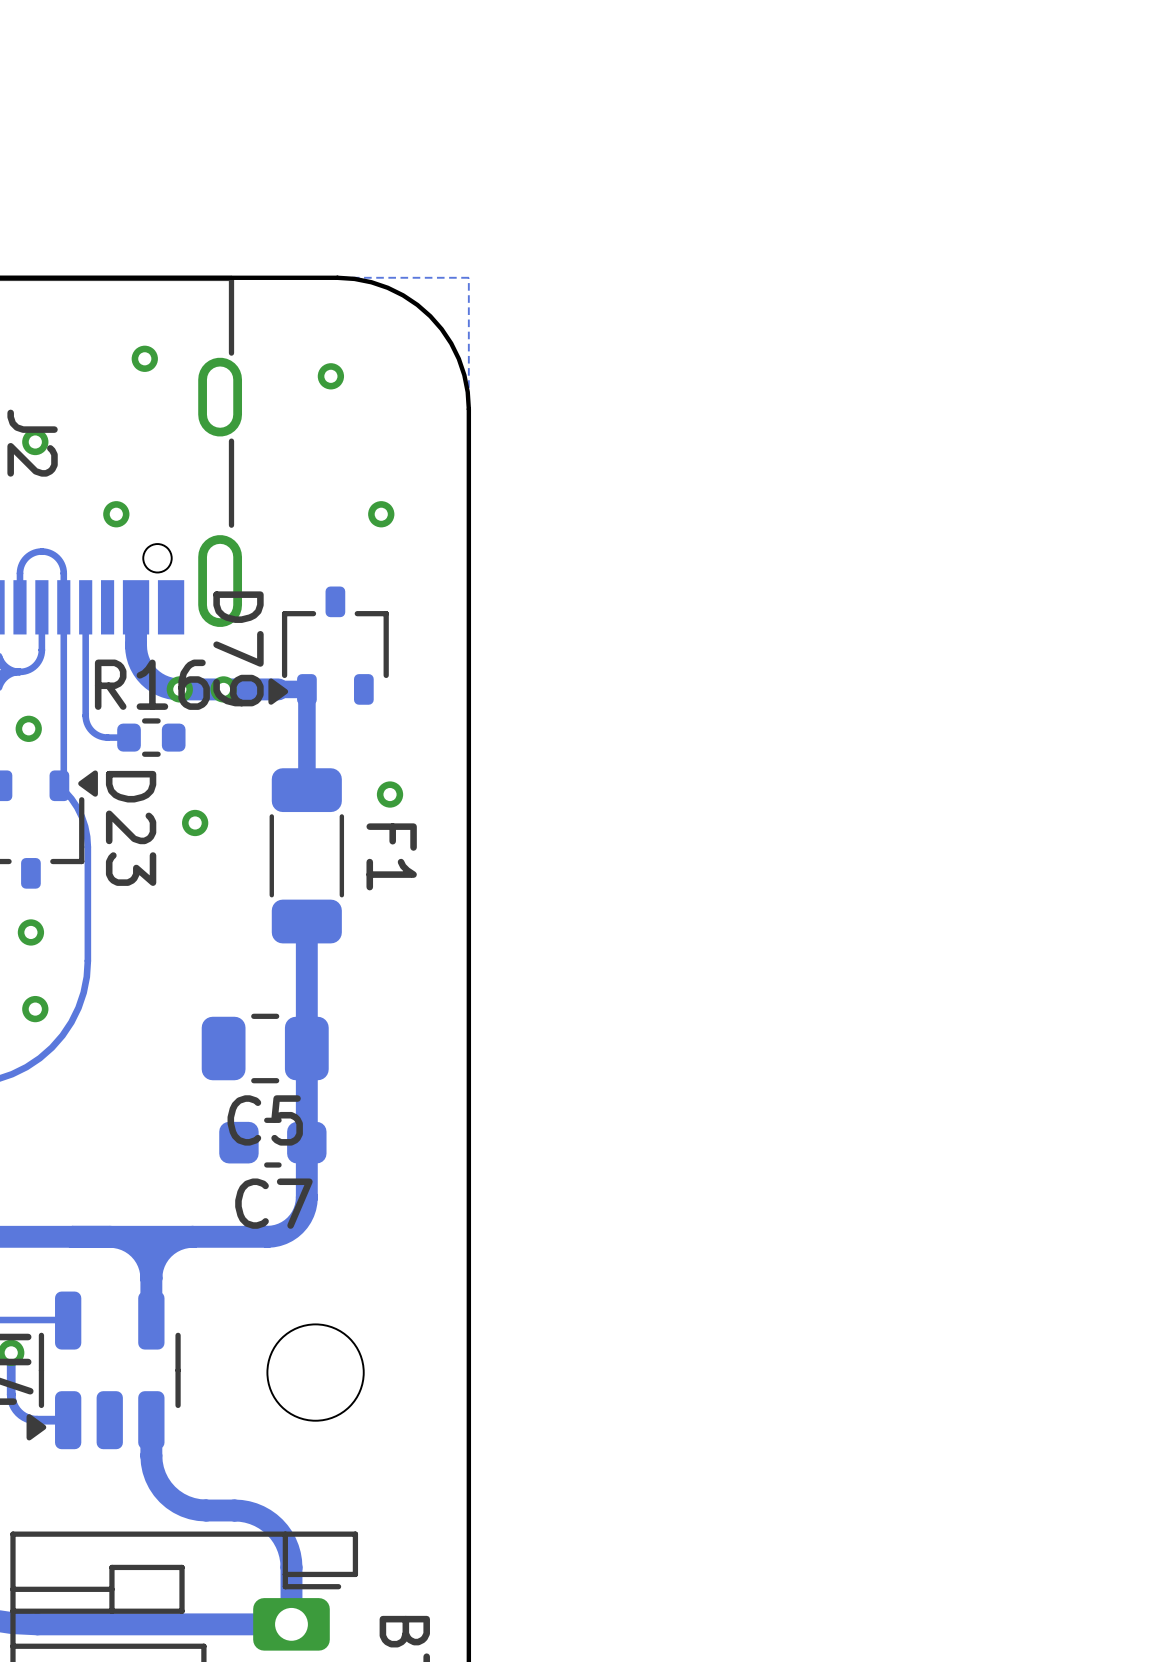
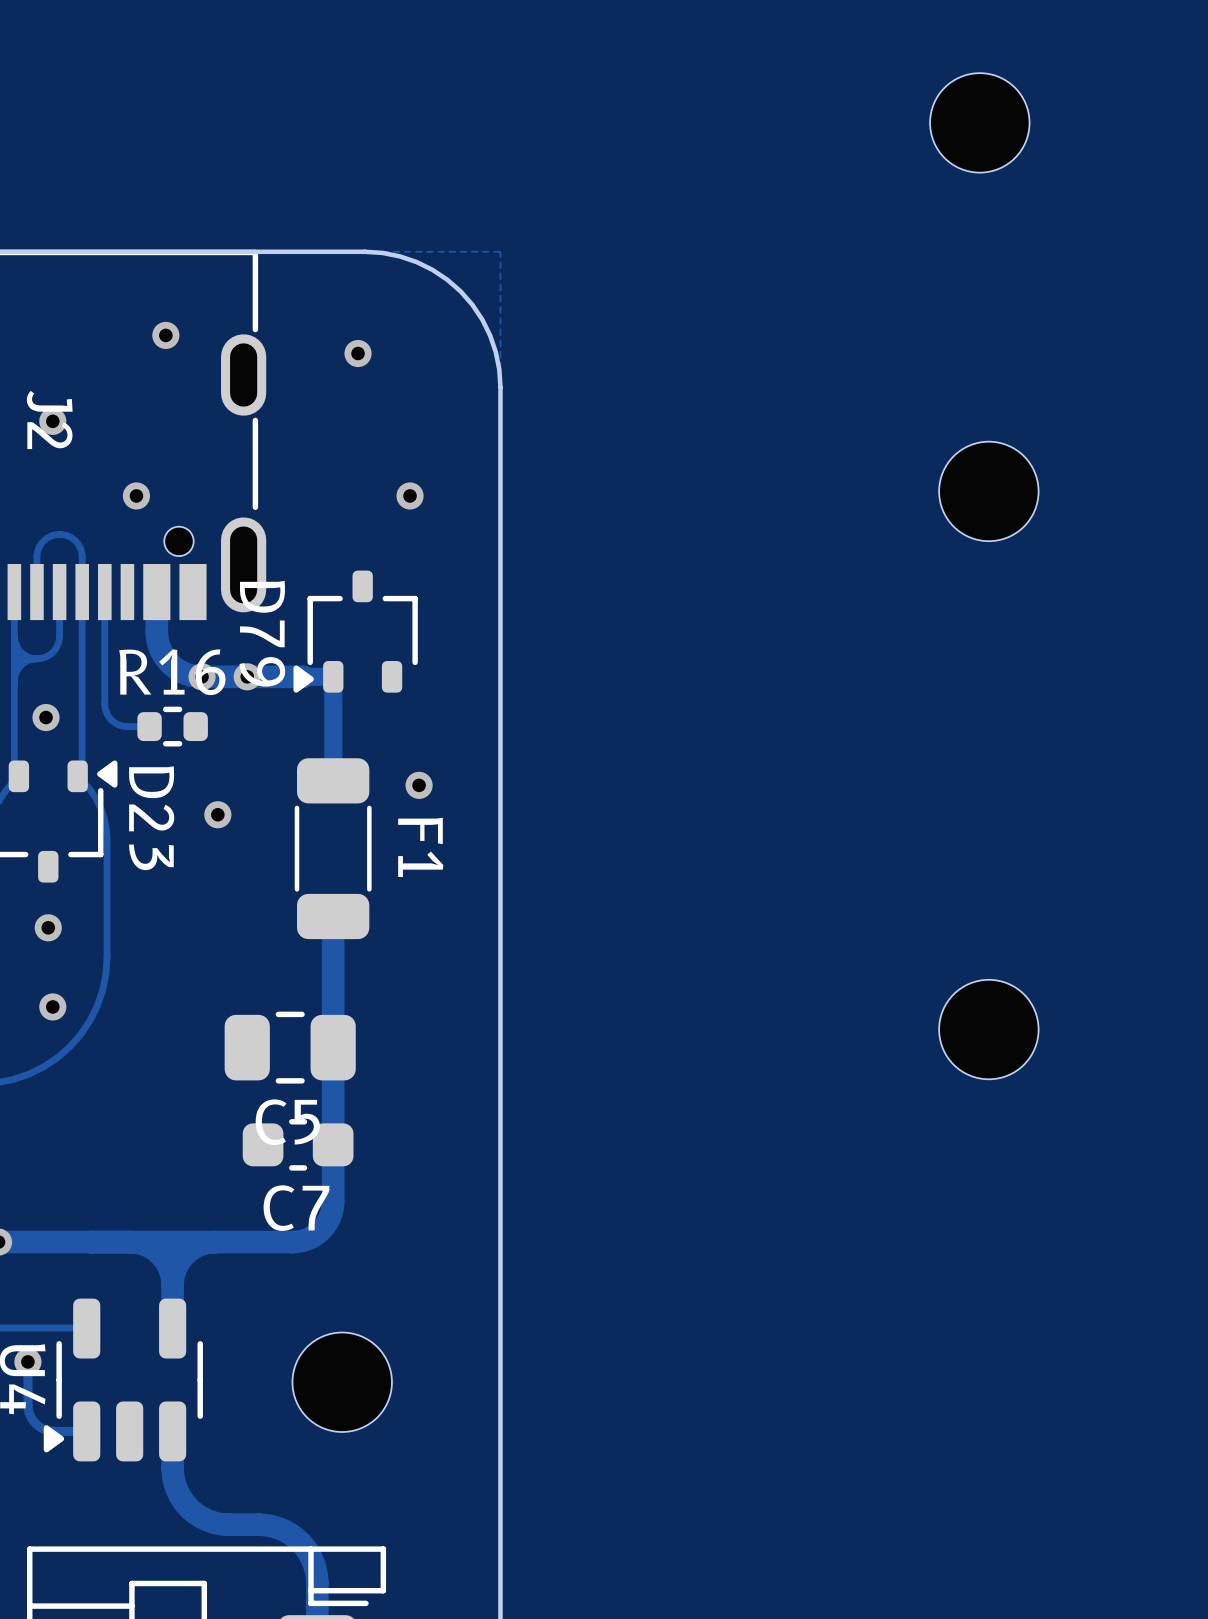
part: none -> (979, 122)
part: none -> (988, 491)
part: none -> (988, 1029)

